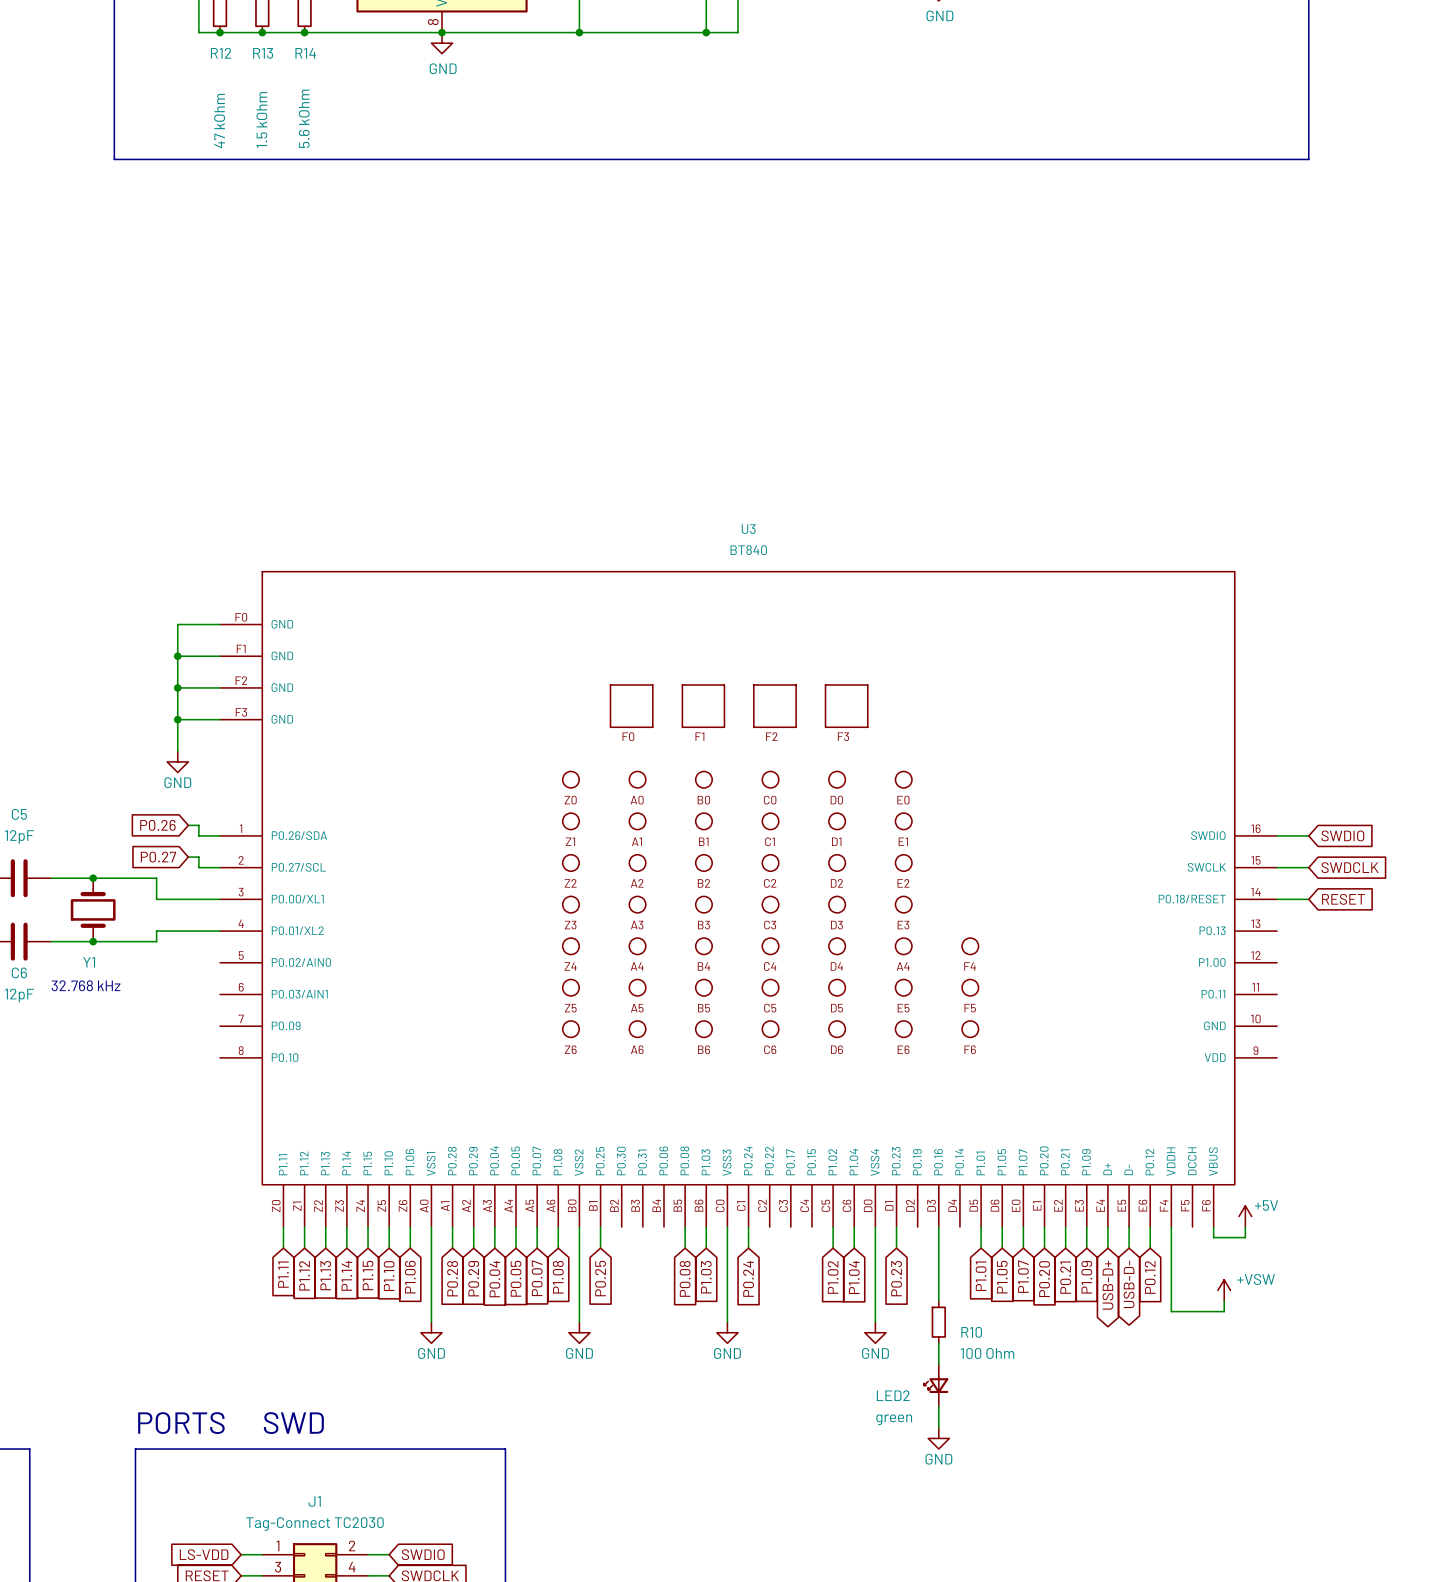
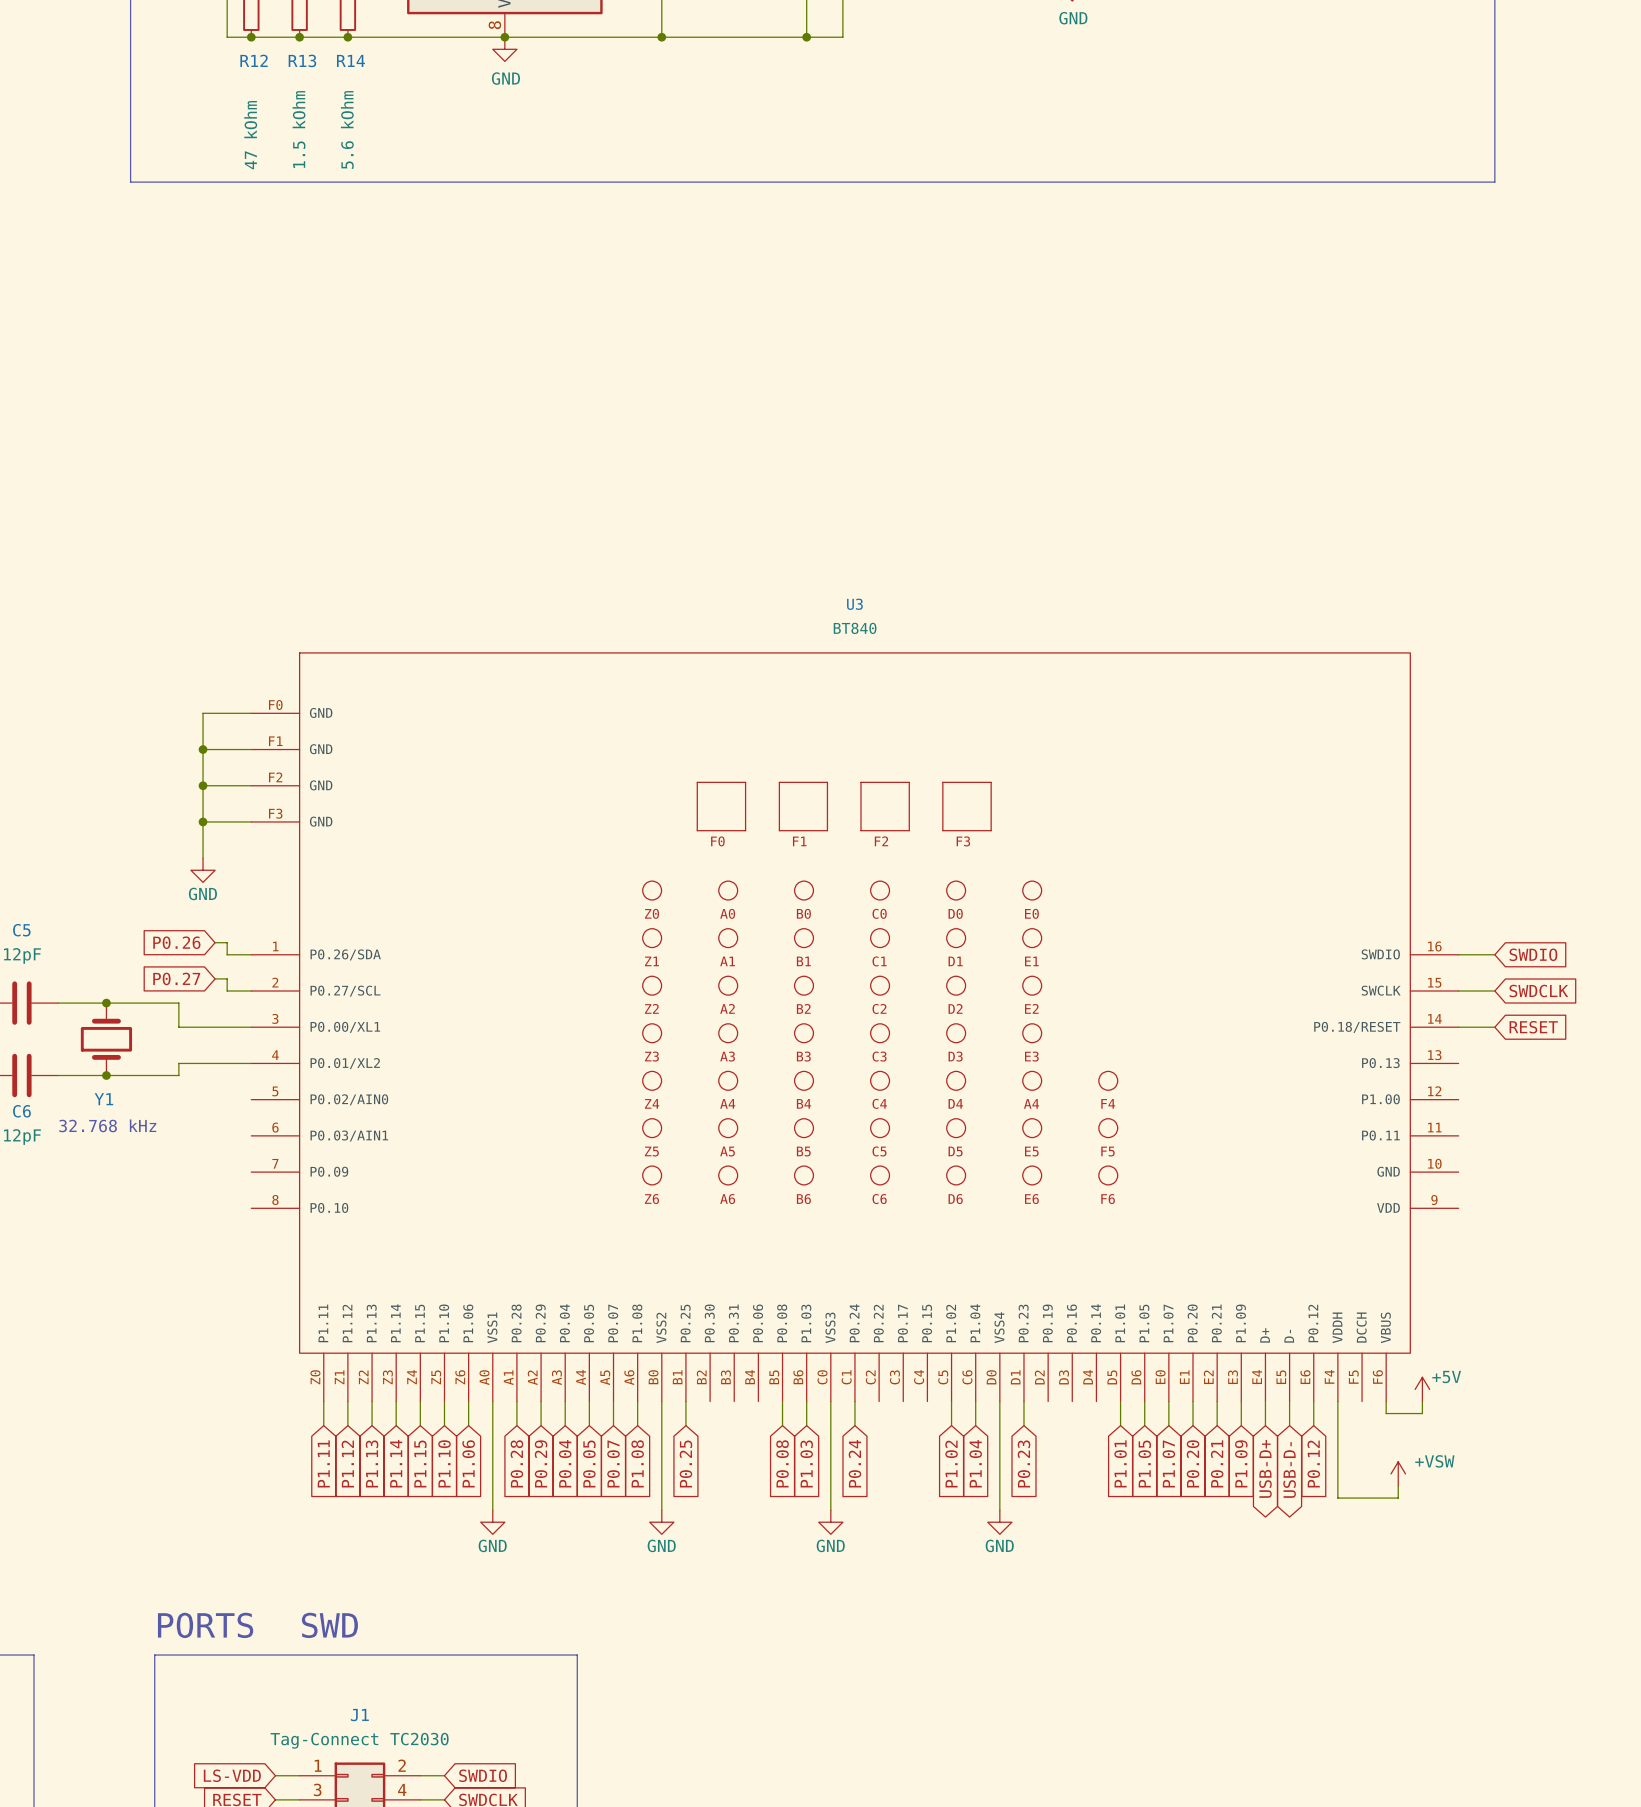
wire: (938, 1227) (938, 1301) -> none
R10: 100 Ohm (938, 1322) -> none
wire: (938, 1343) (938, 1364) -> none
LED2: green (936, 1385) -> none
wire: (938, 1406) (938, 1427) -> none
power symbol: GND (938, 1438) -> none

